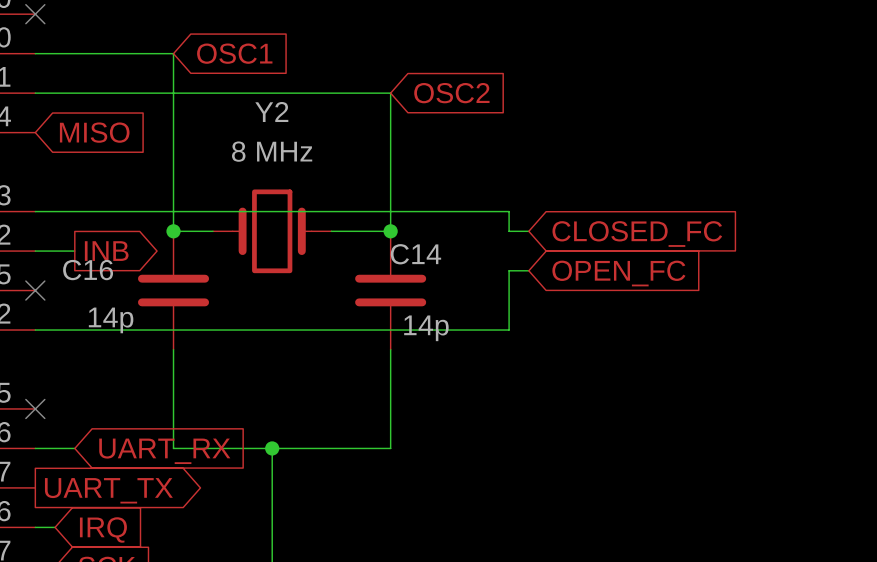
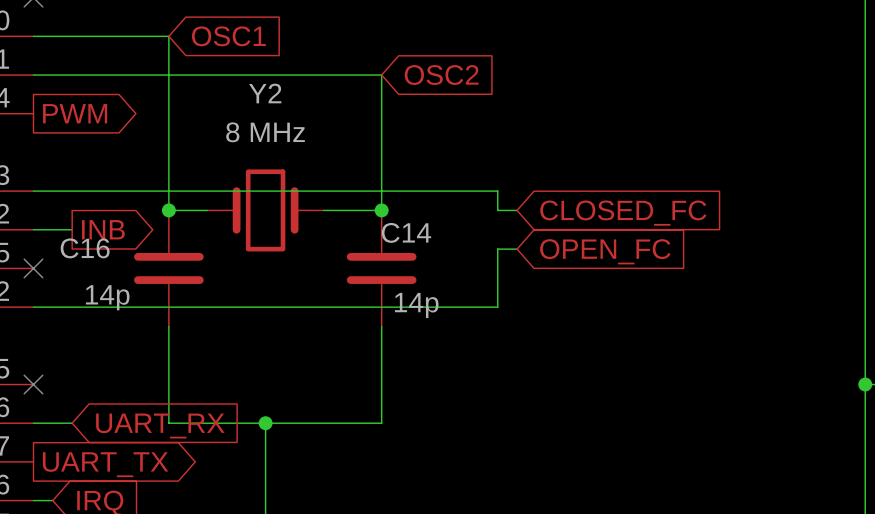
global label shape: input (94, 132) -> output (75, 113)
global label: MISO (94, 132) -> PWM (75, 113)

